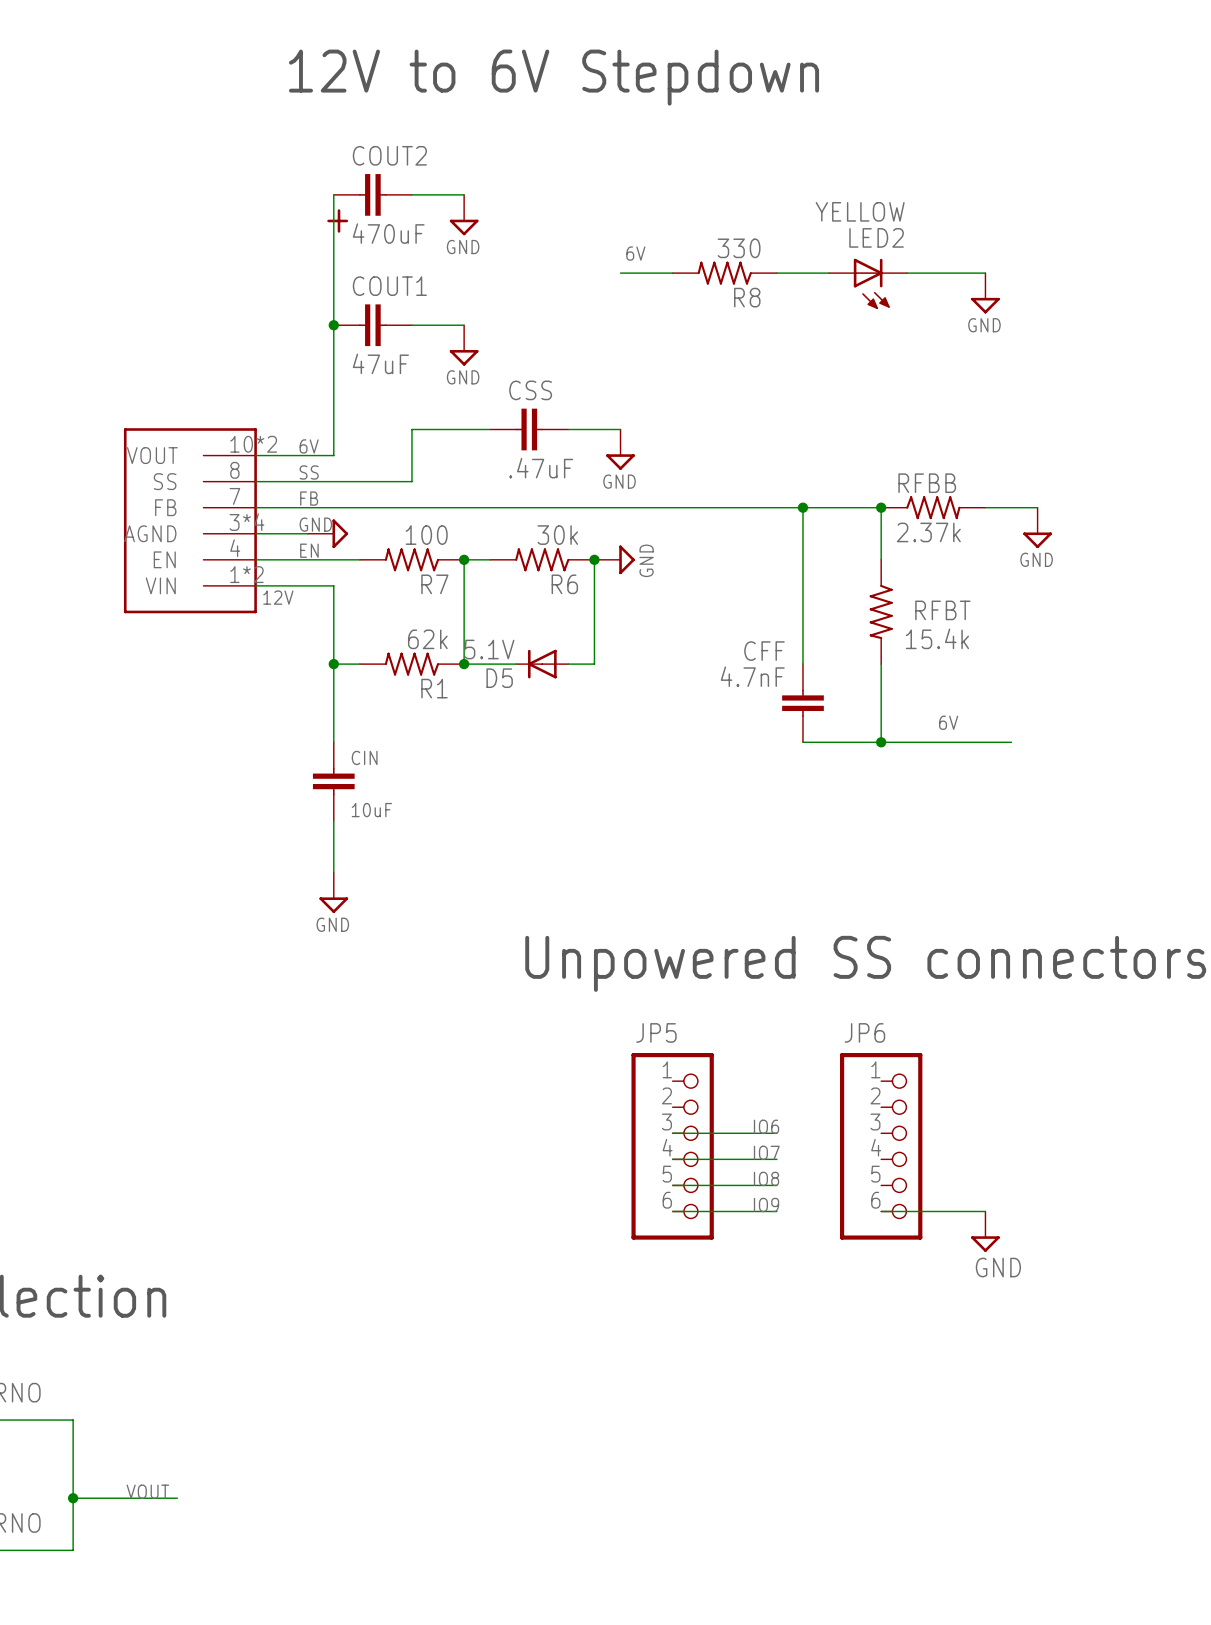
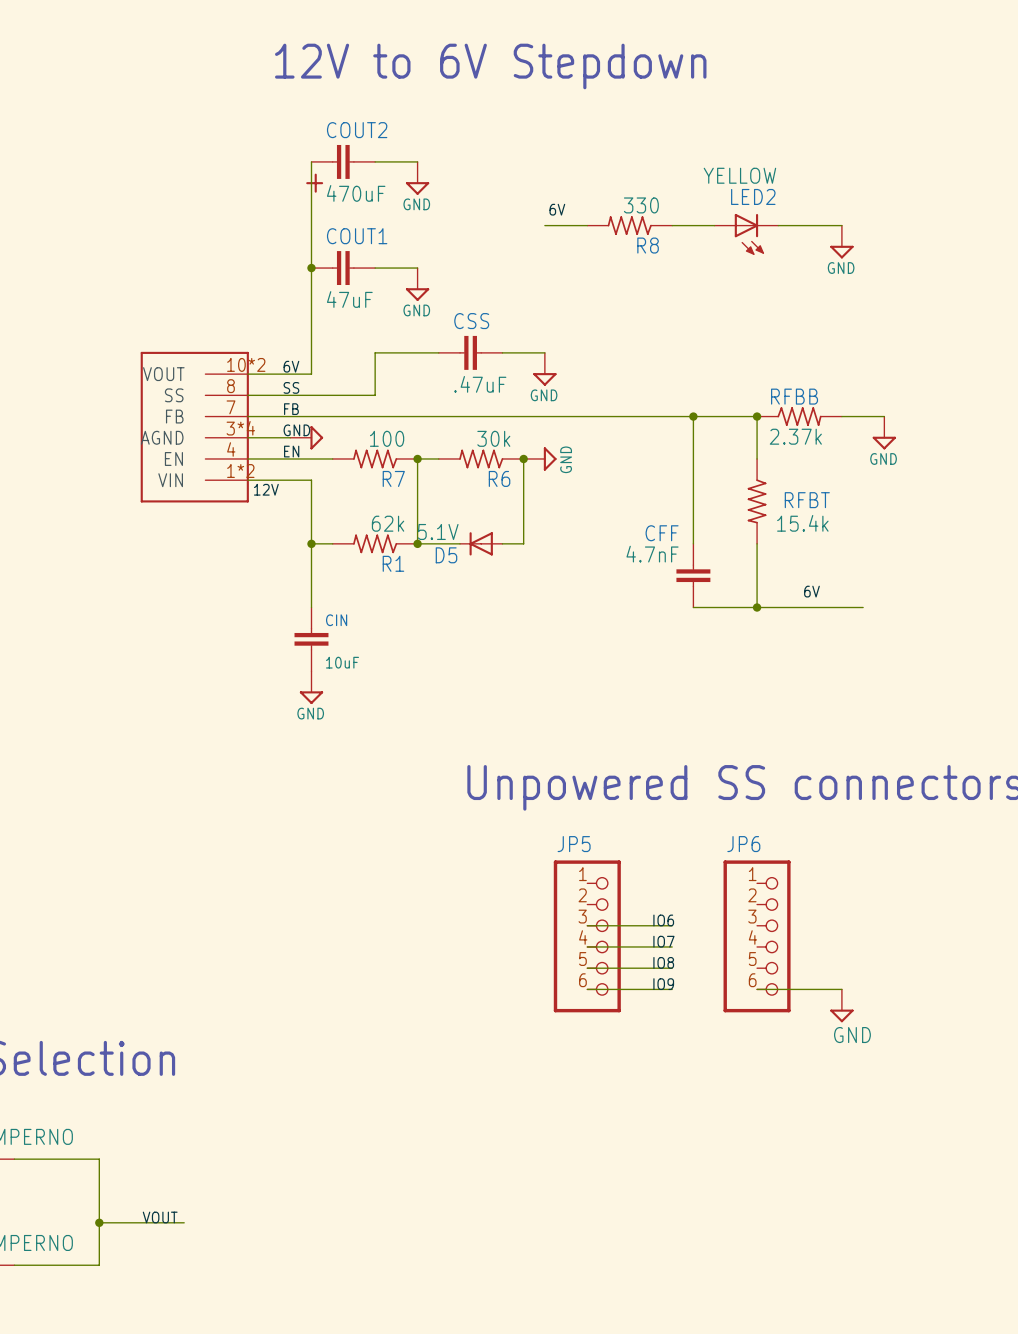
power symbol position: GND (333, 892) -> GND (311, 687)

